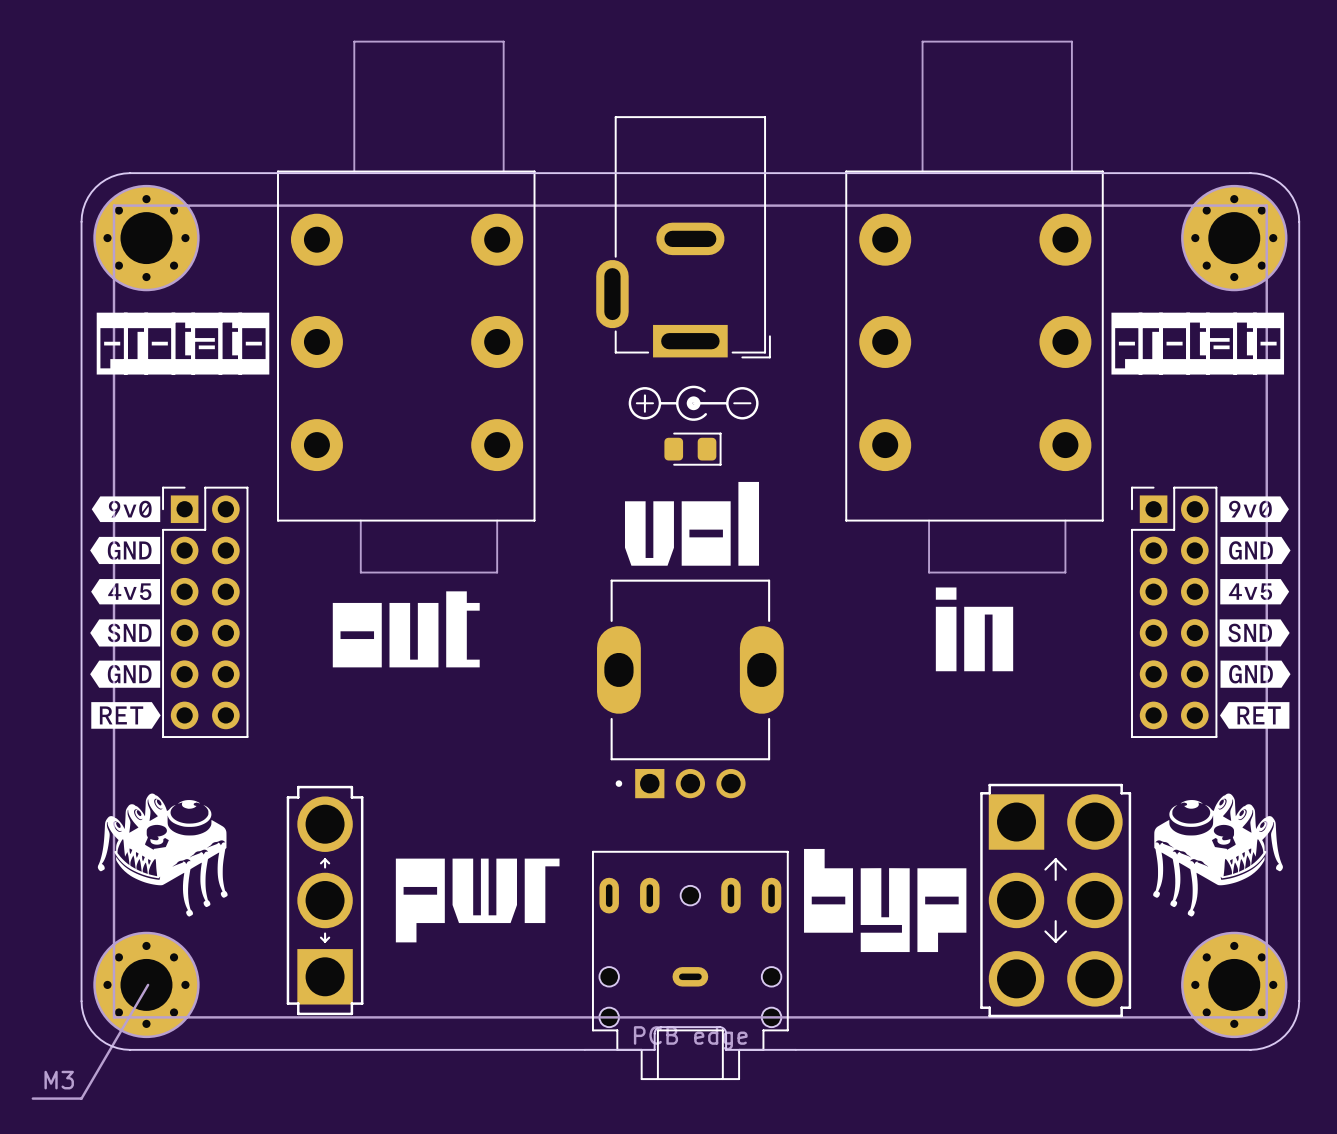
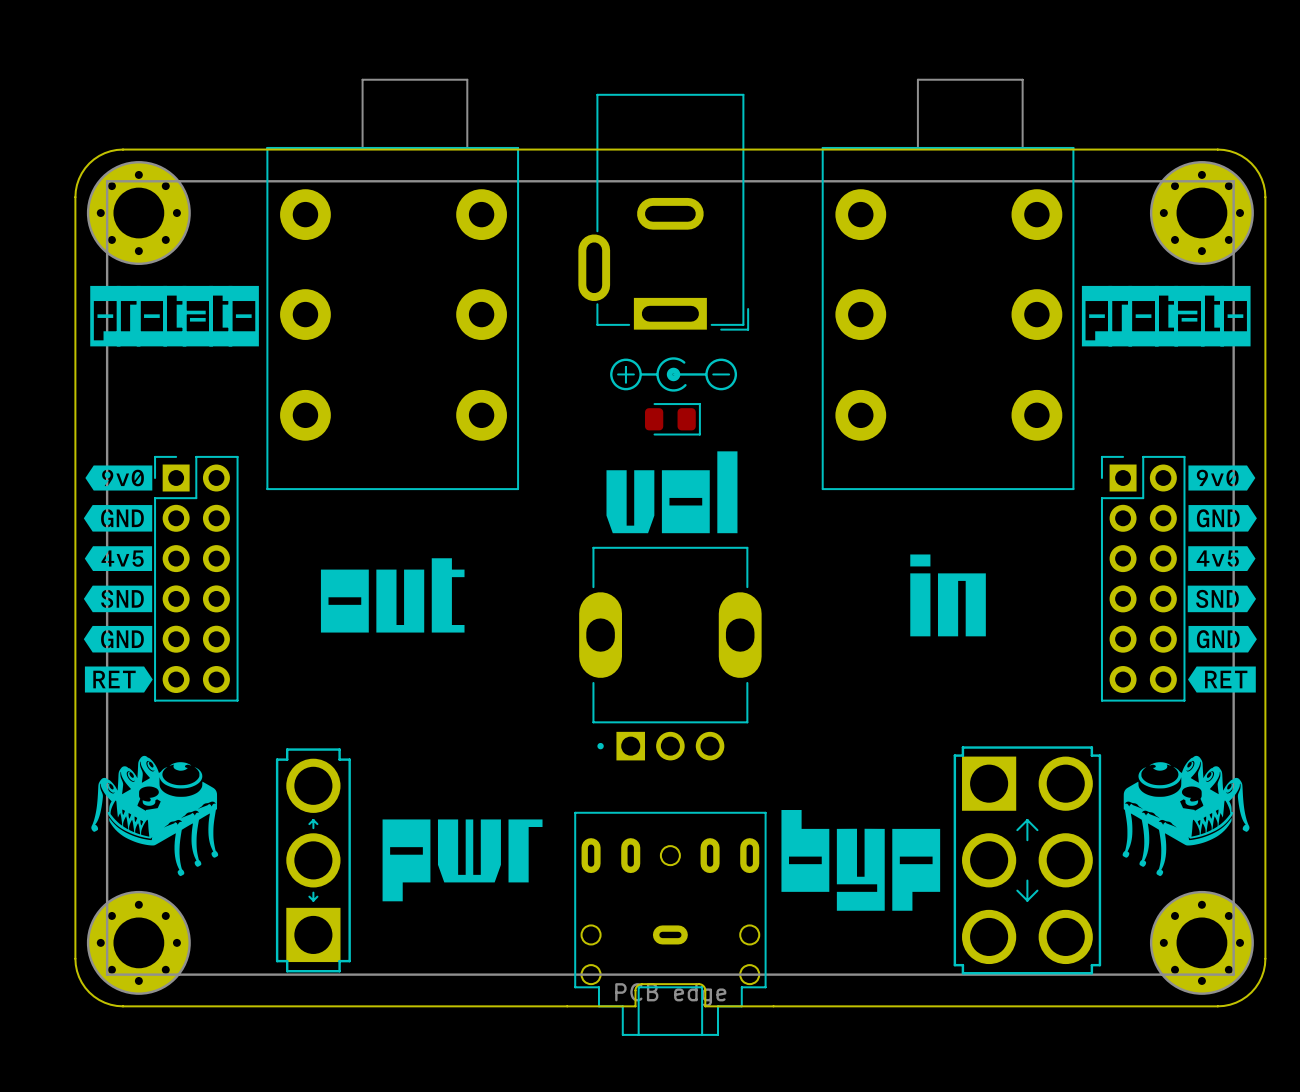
part footprint: [277, 41, 536, 573] -> [266, 79, 520, 491]
part footprint: [845, 41, 1104, 573] -> [821, 79, 1075, 491]
line: (148, 984) (81, 1098) (32, 1098) -> none
text: M3 (59, 1080) -> none

